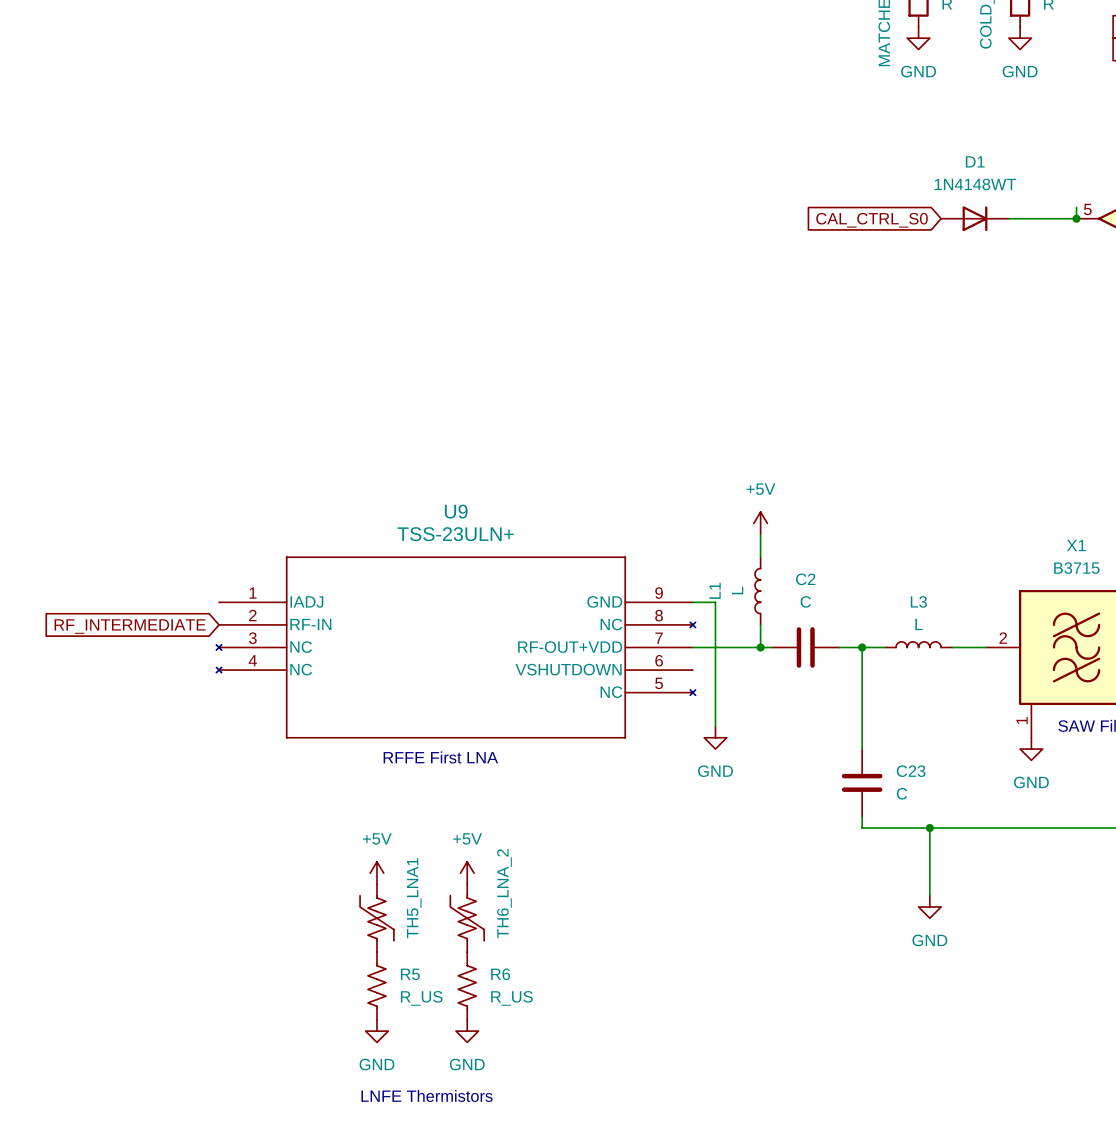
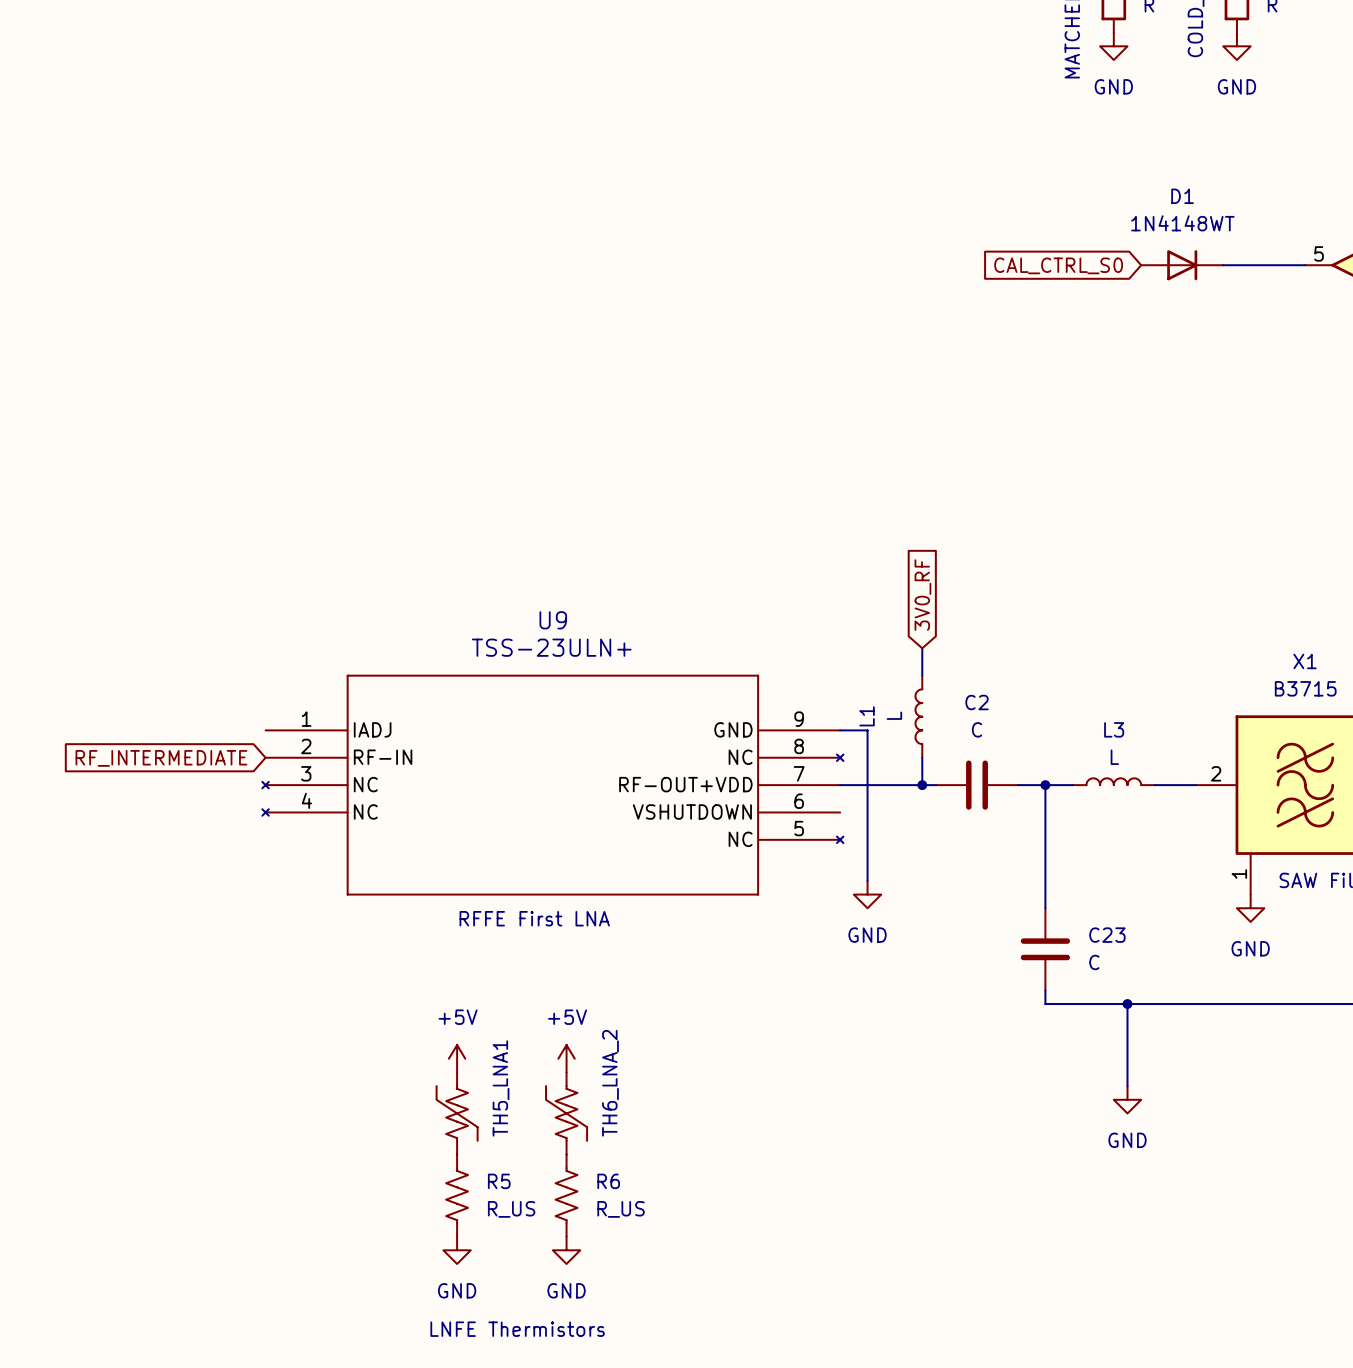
wire: (1076, 207) (1076, 218) -> none
junction: (1076, 218) -> none
global label: none -> 3V0_RF (922, 595)
power symbol: +5V (760, 523) -> none

